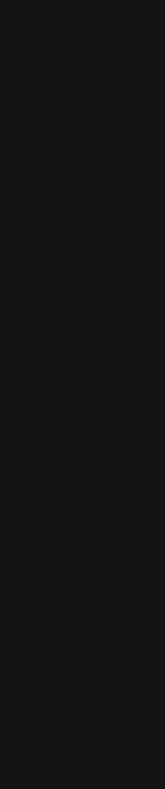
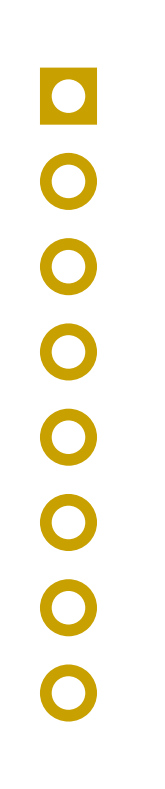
part: none -> (68, 394)

